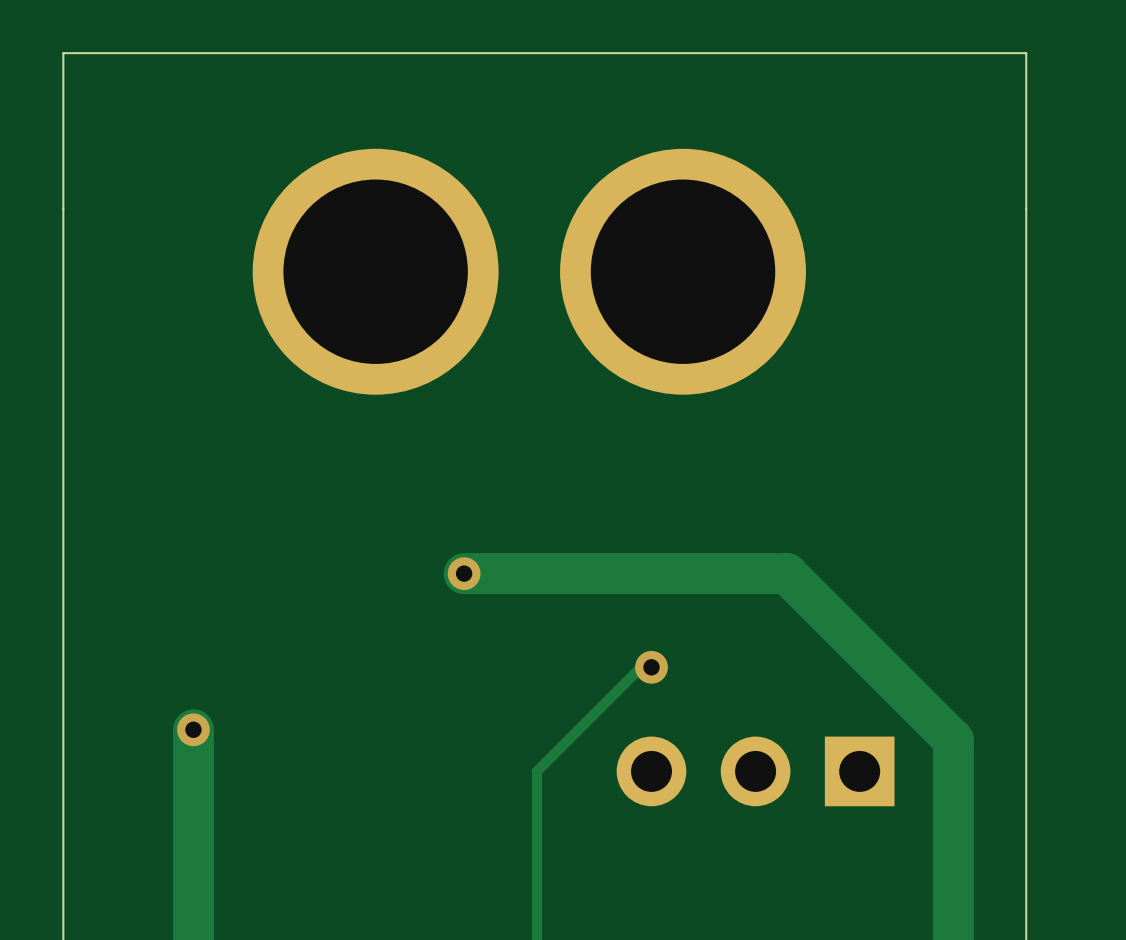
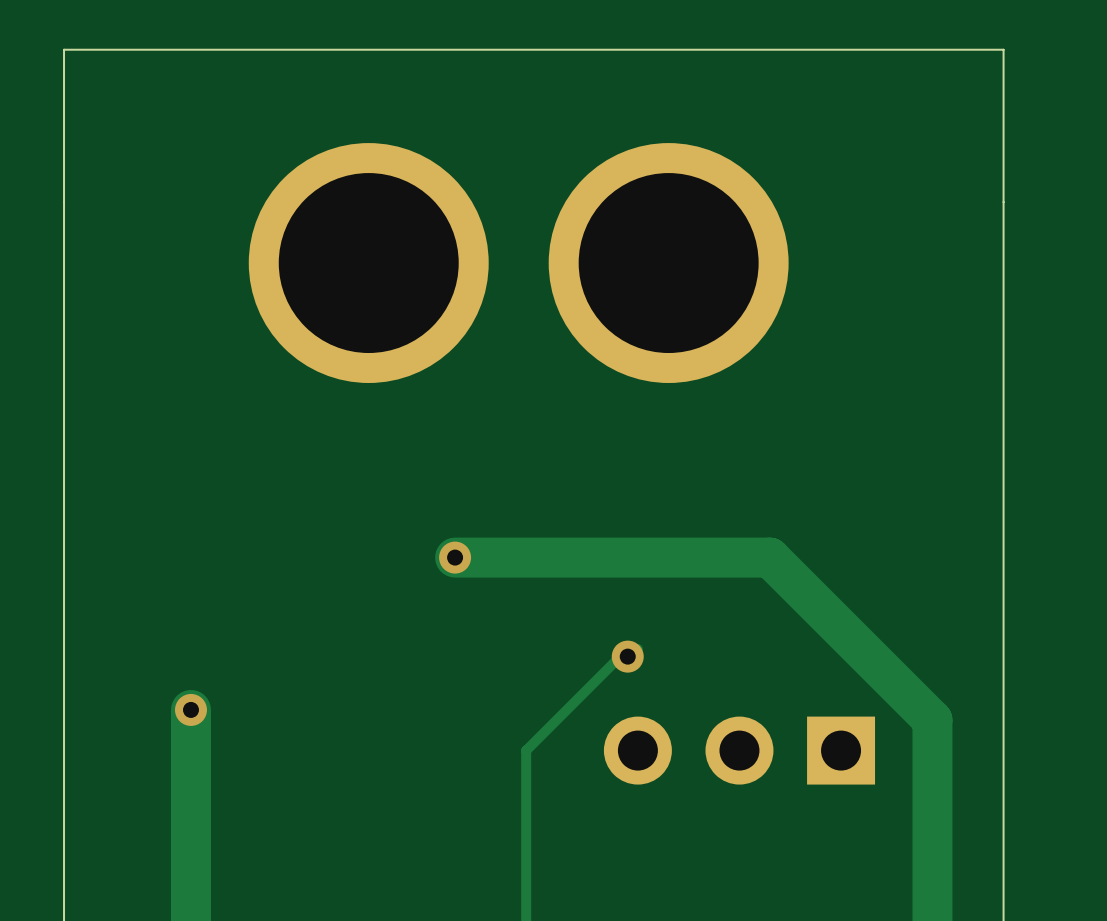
via position: (651, 667) -> (627, 656)

